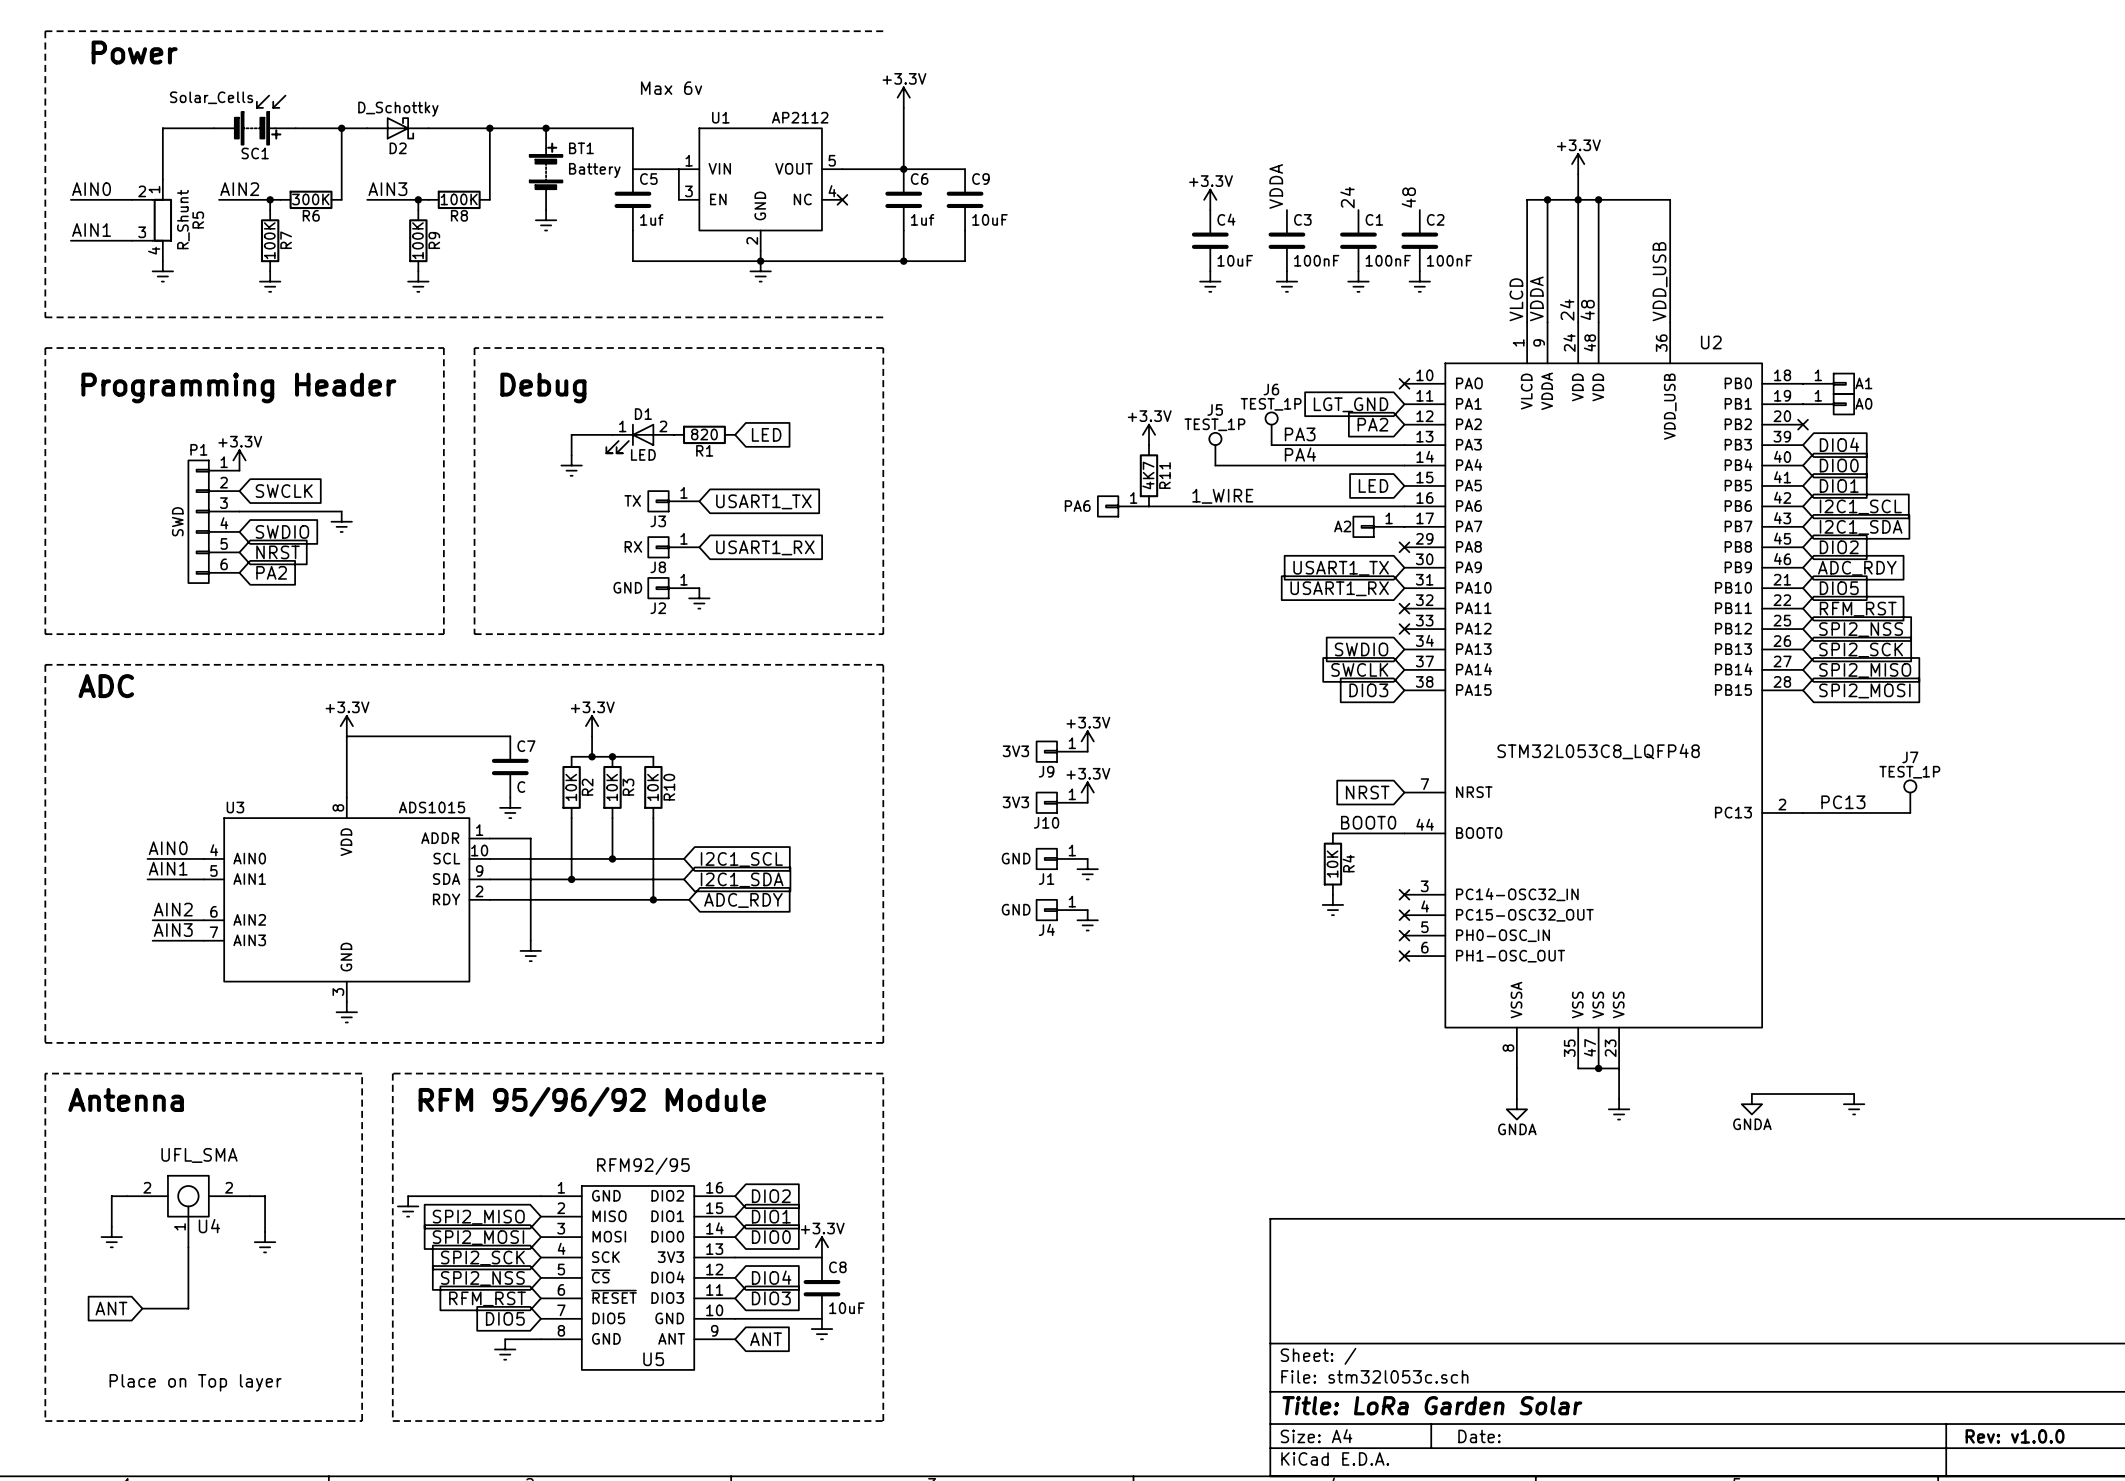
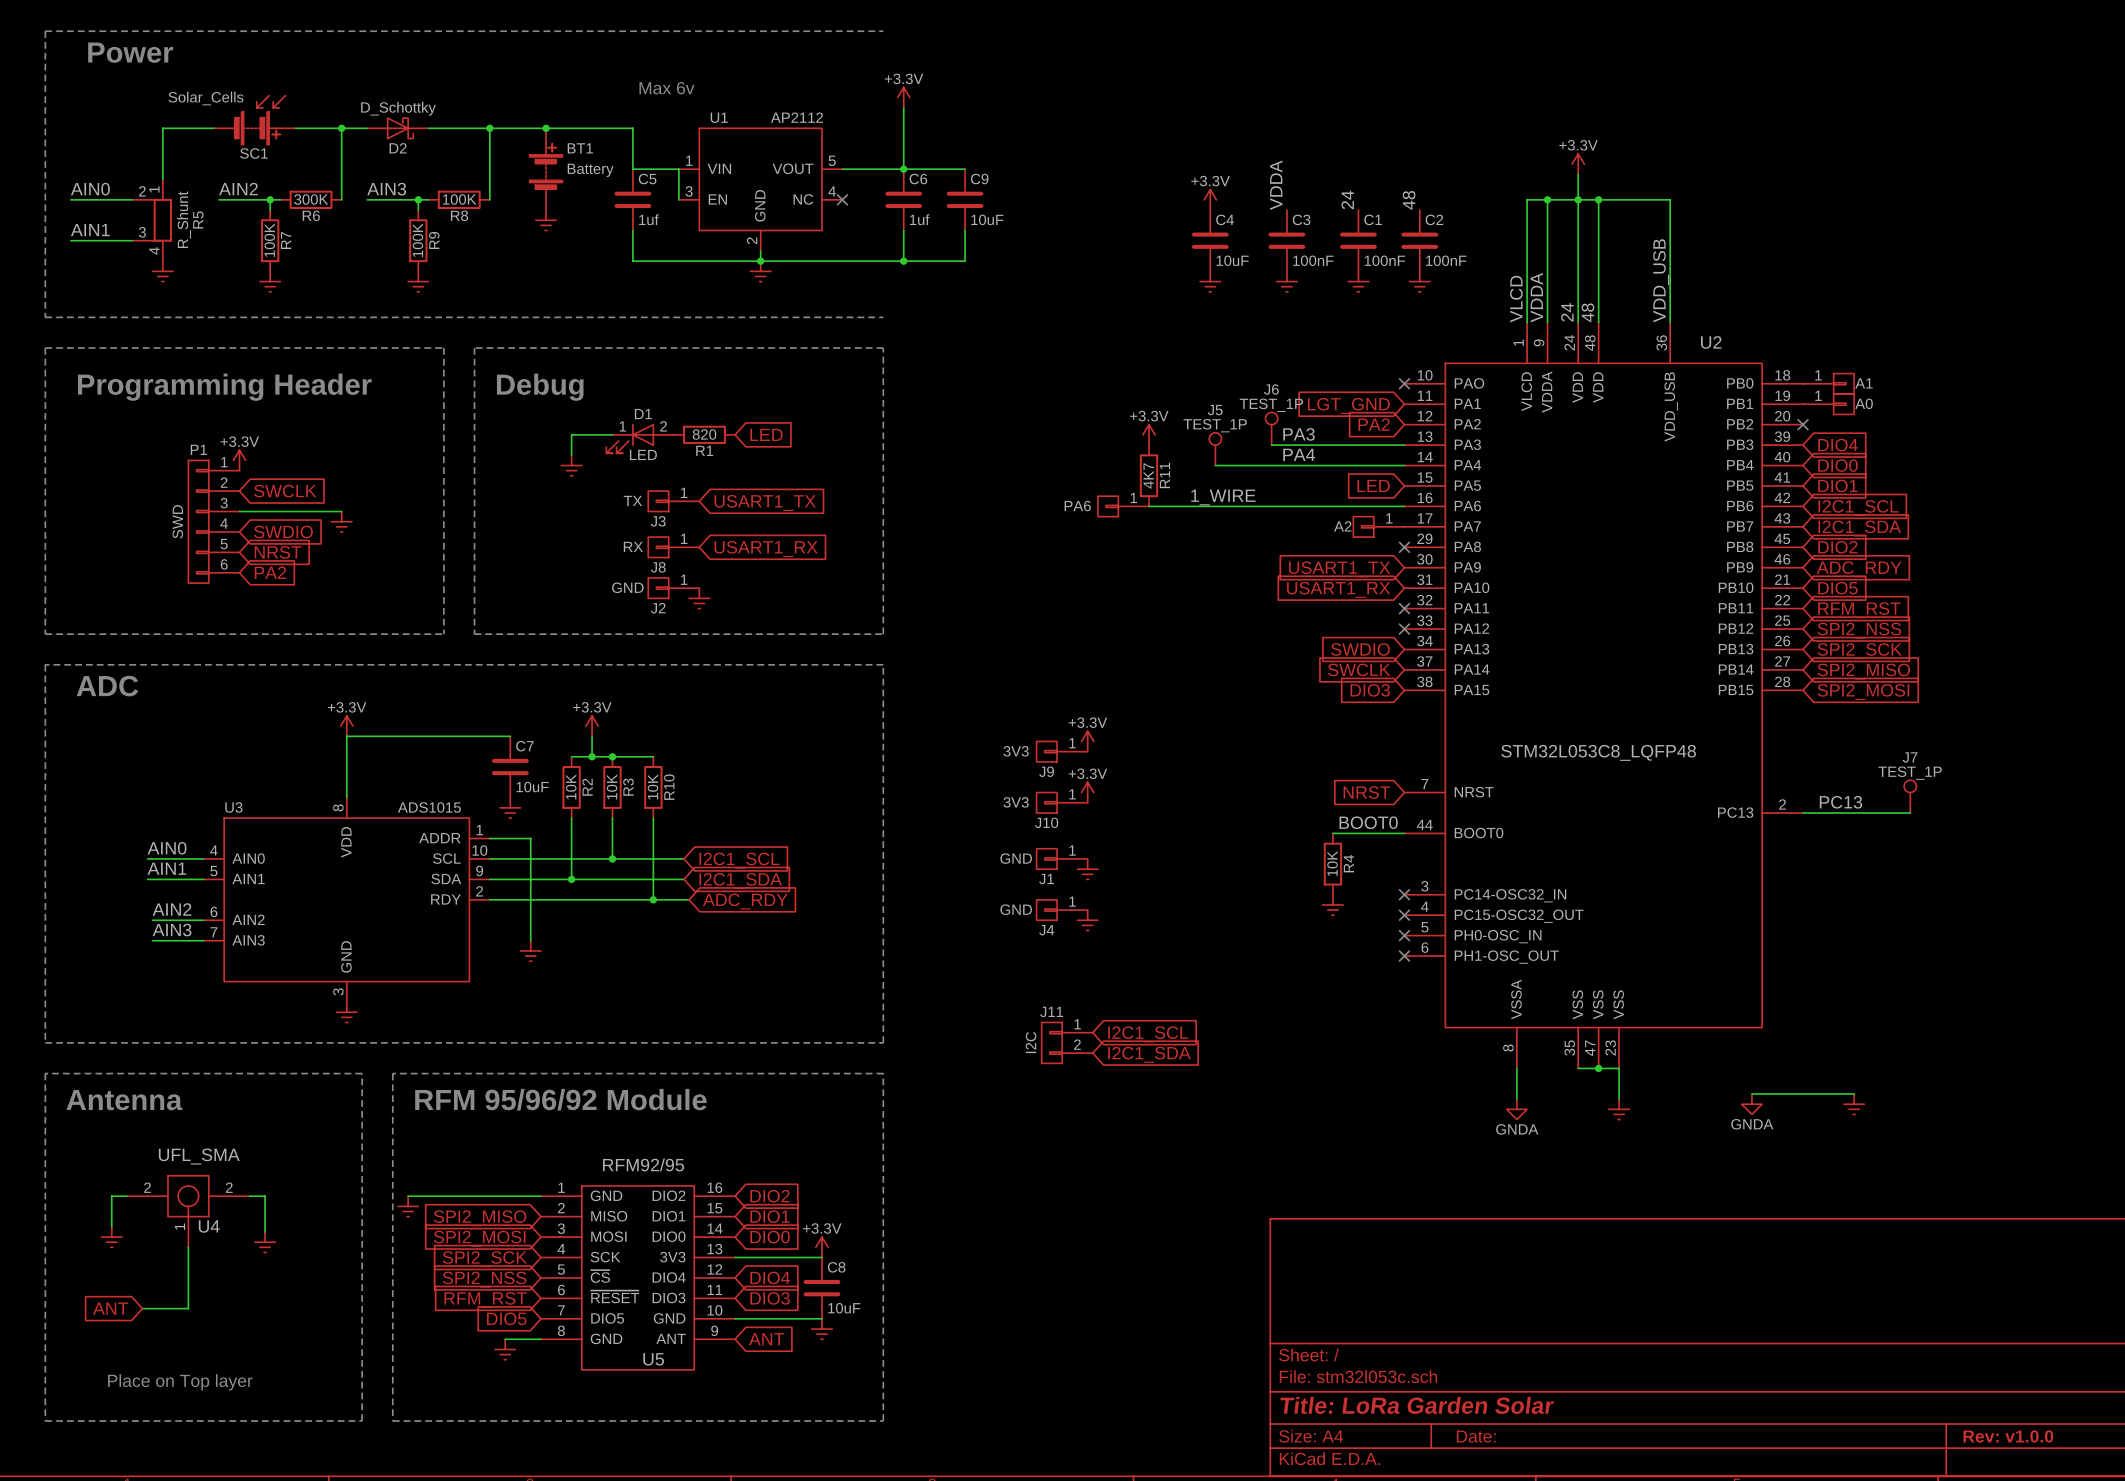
C7 value: C (521, 787) -> 10uF (532, 787)
global label: none -> I2C1_SCL (1148, 1034)
J11: none -> I2C (1067, 1042)
global label: none -> I2C1_SDA (1149, 1054)

